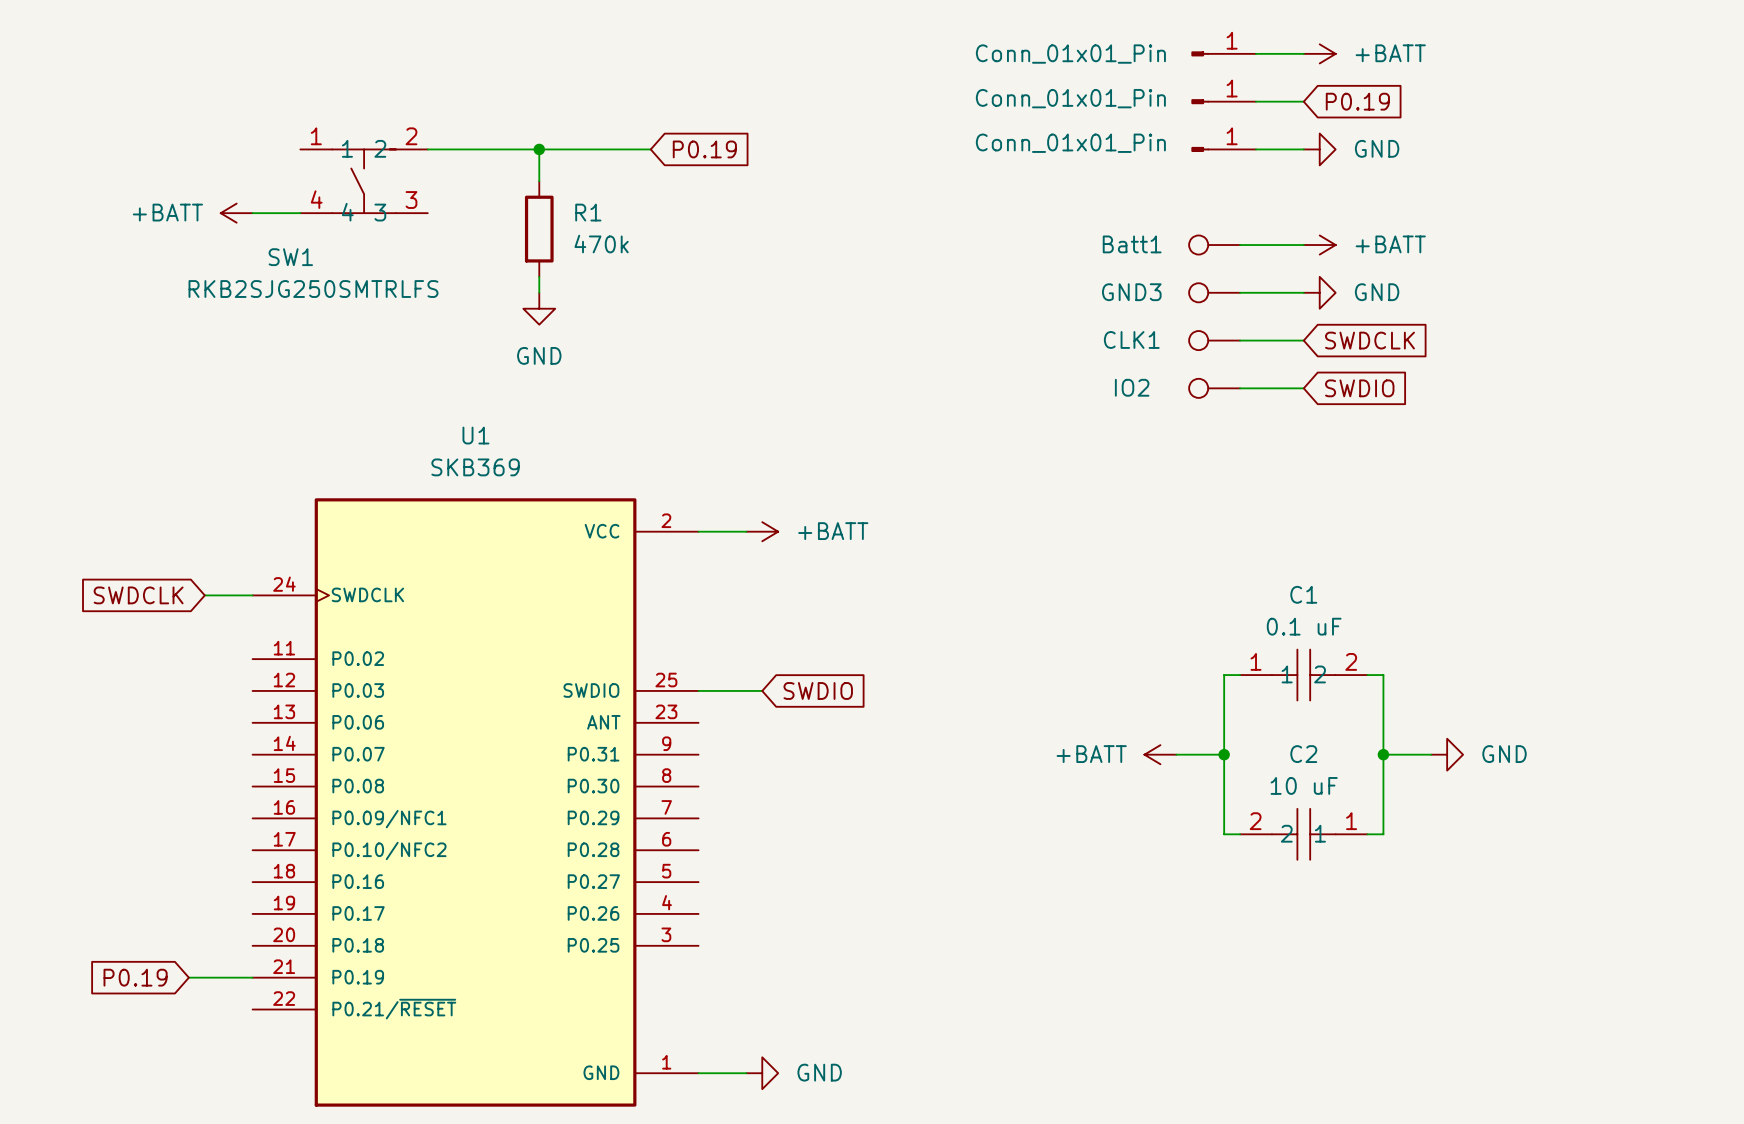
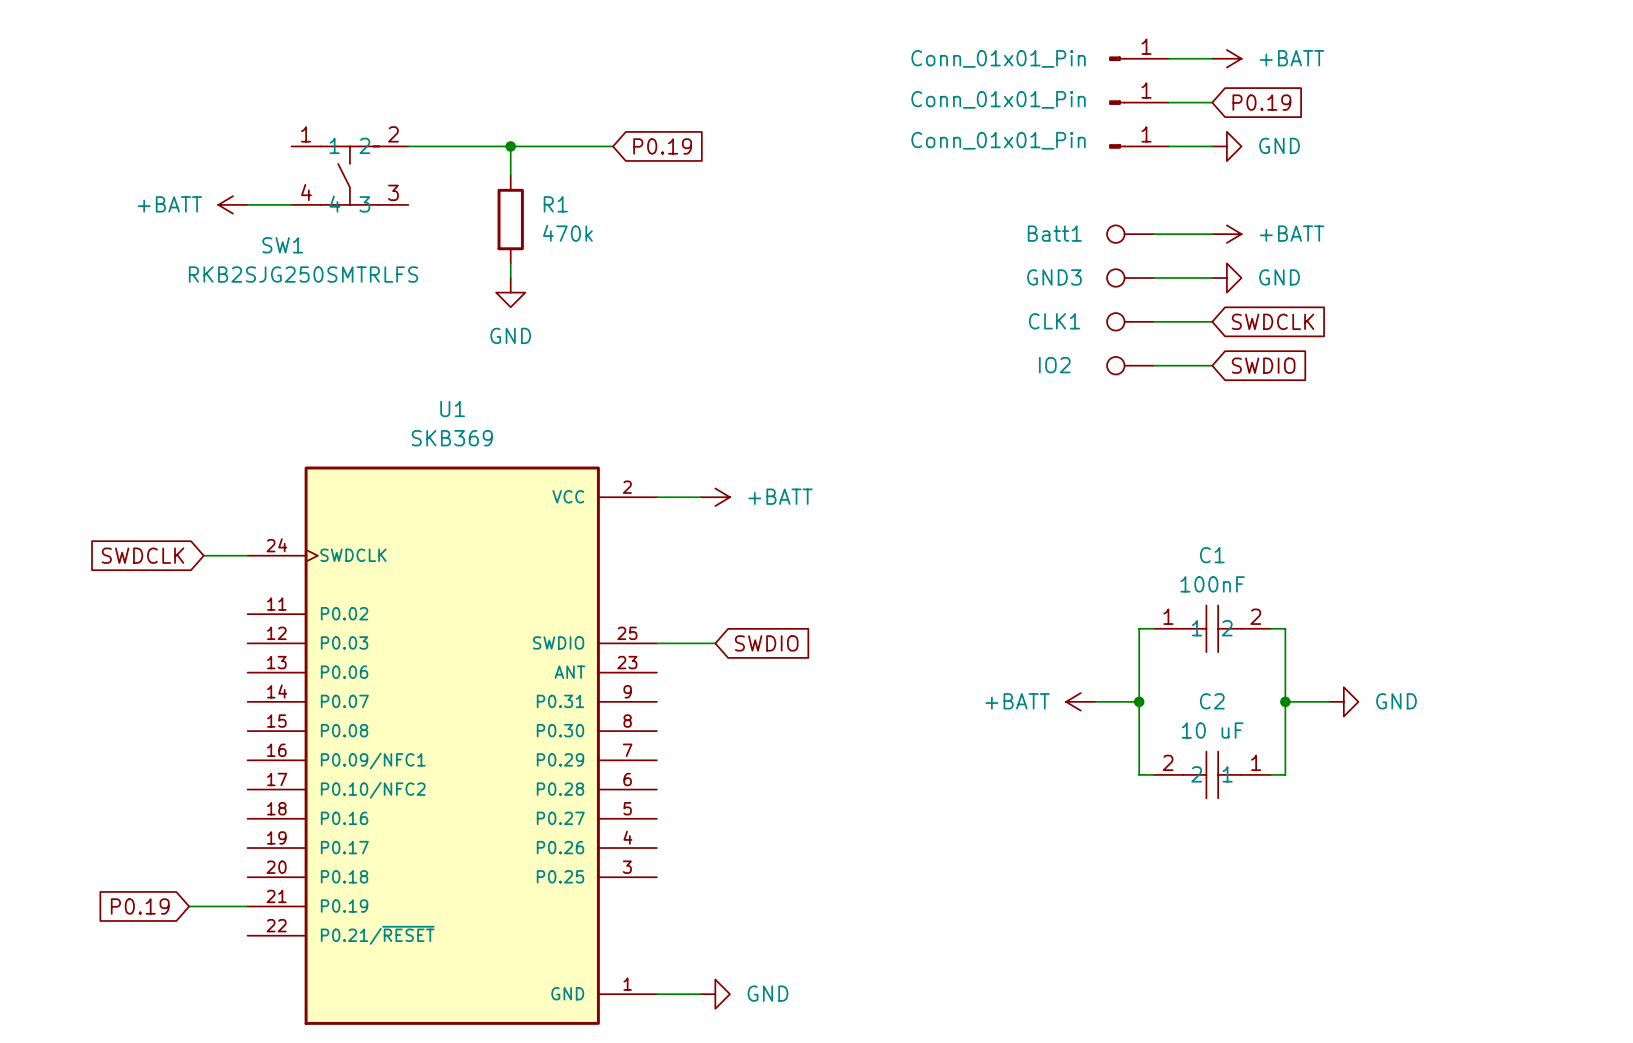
C1 value: 0.1 uF (1304, 626) -> 100nF (1212, 584)

